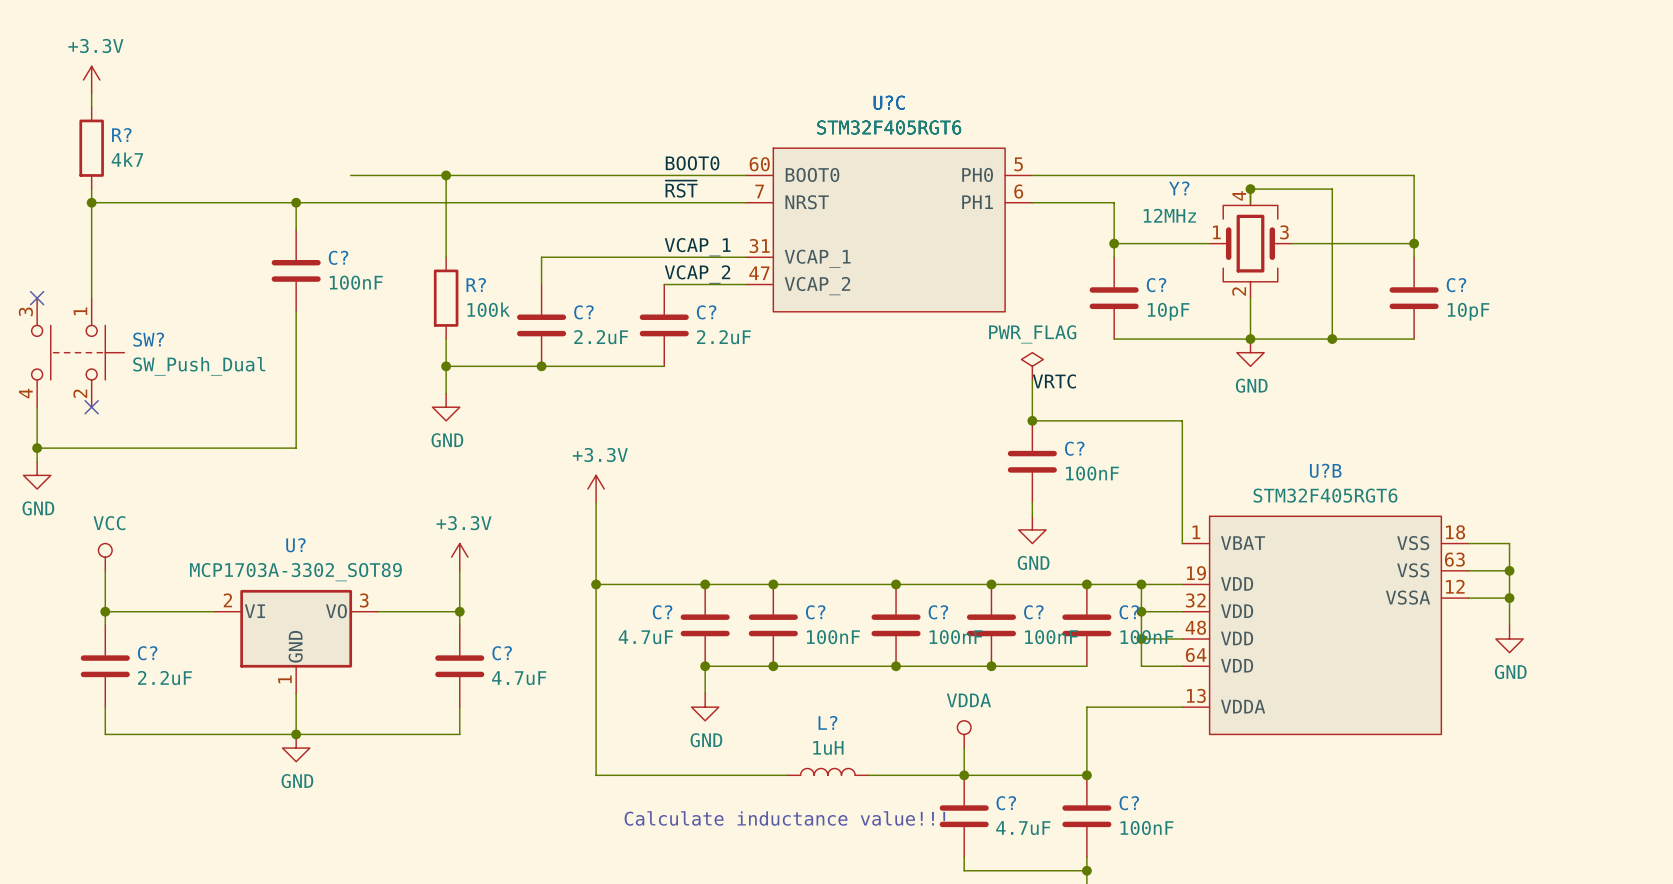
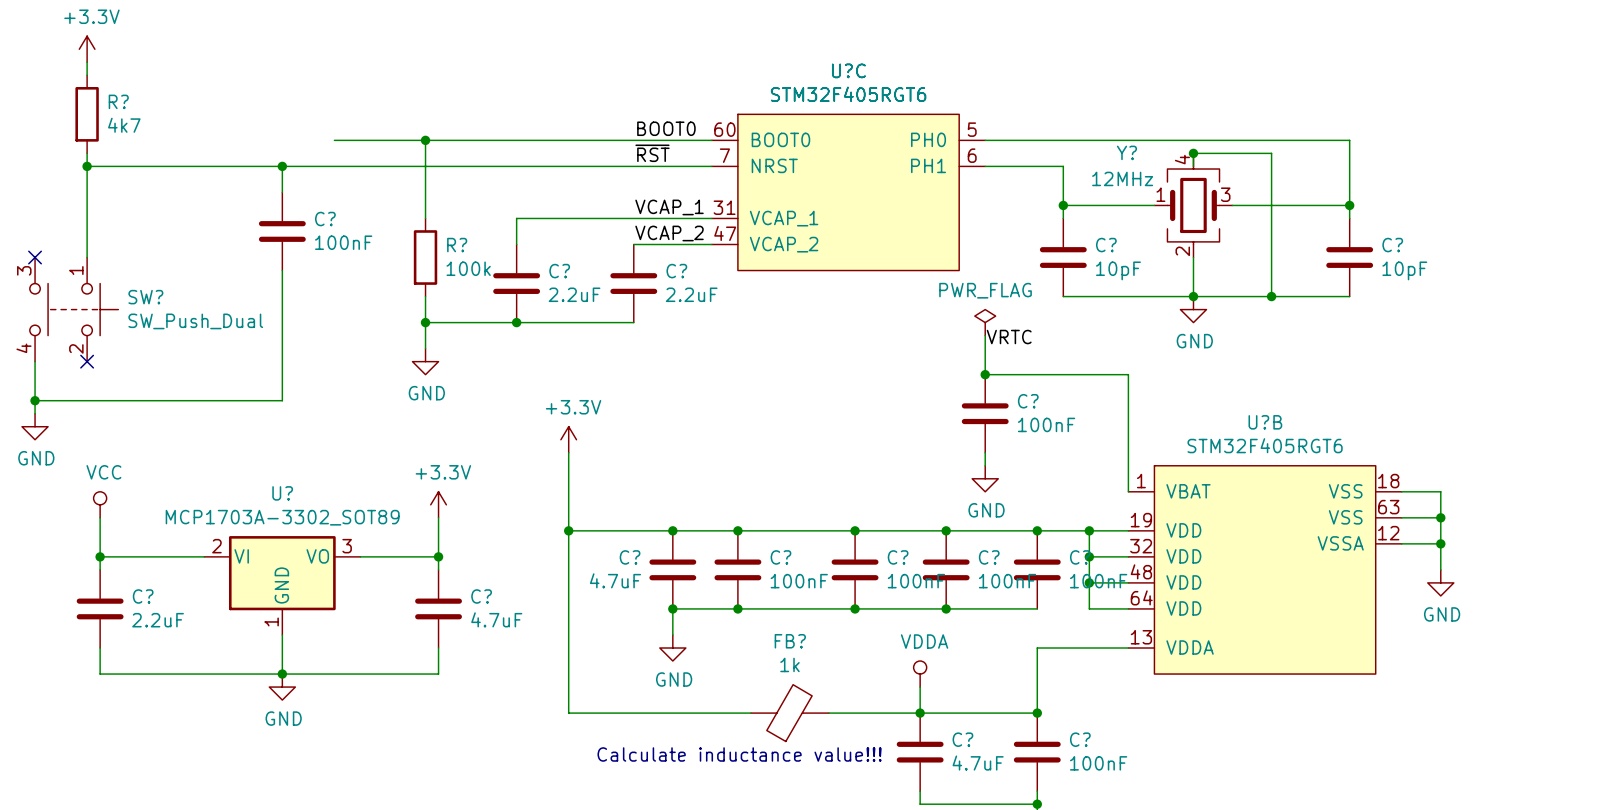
L?: 1uH (827, 771) -> none
FB?: none -> 1k (789, 713)

